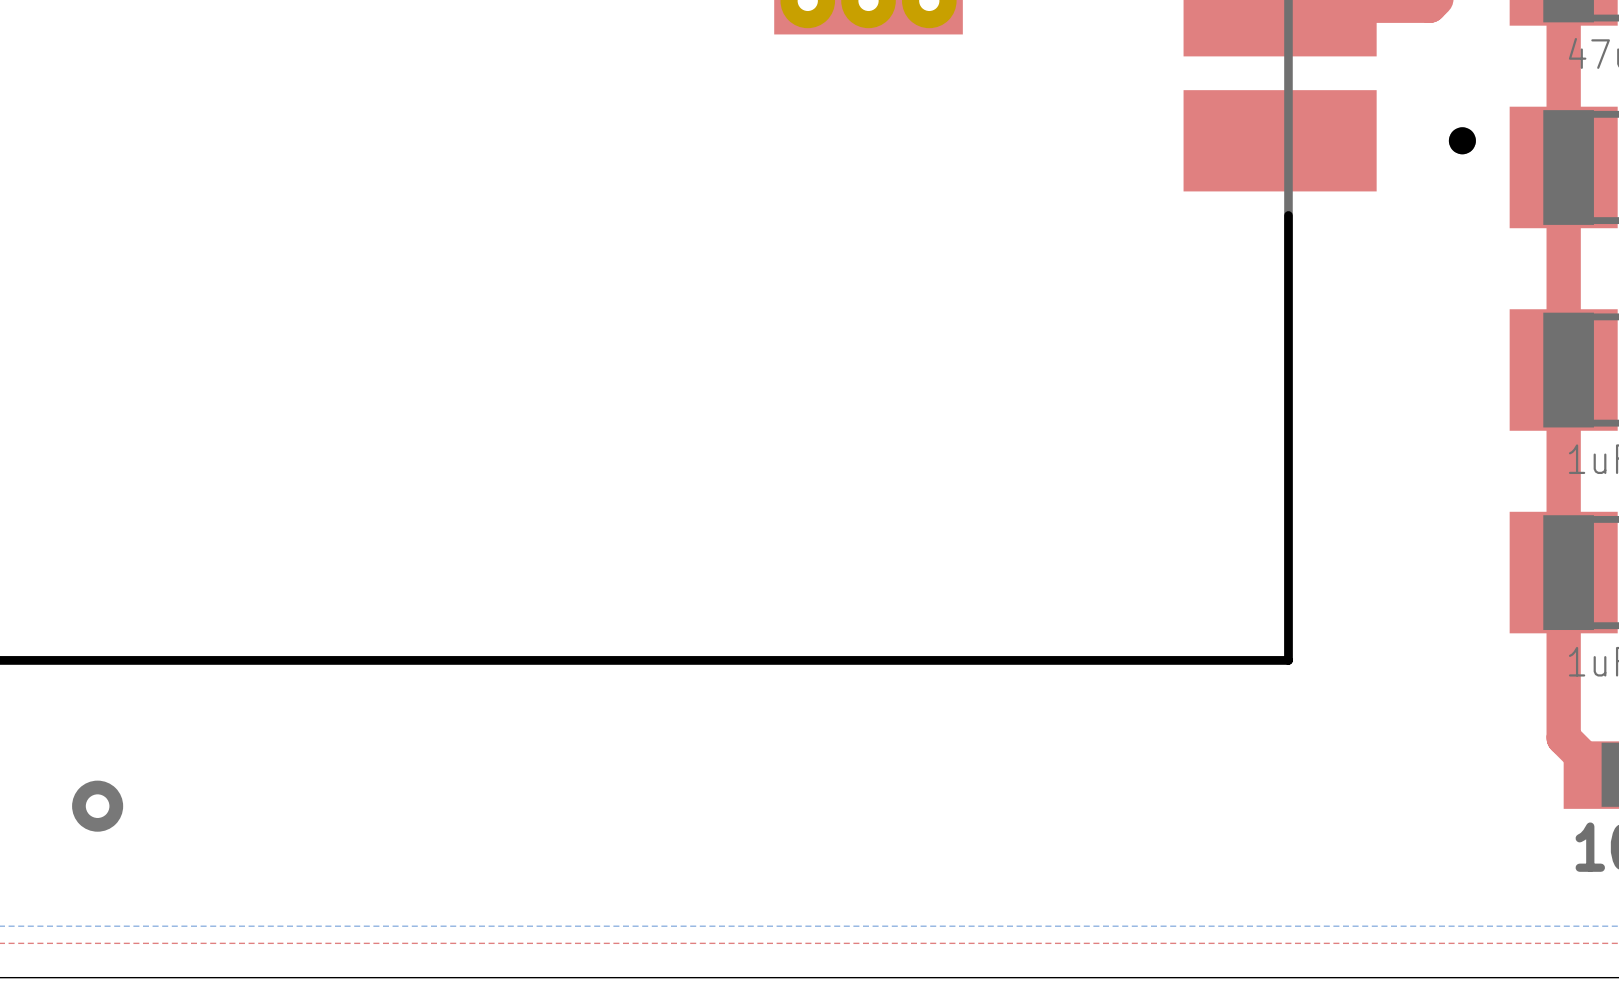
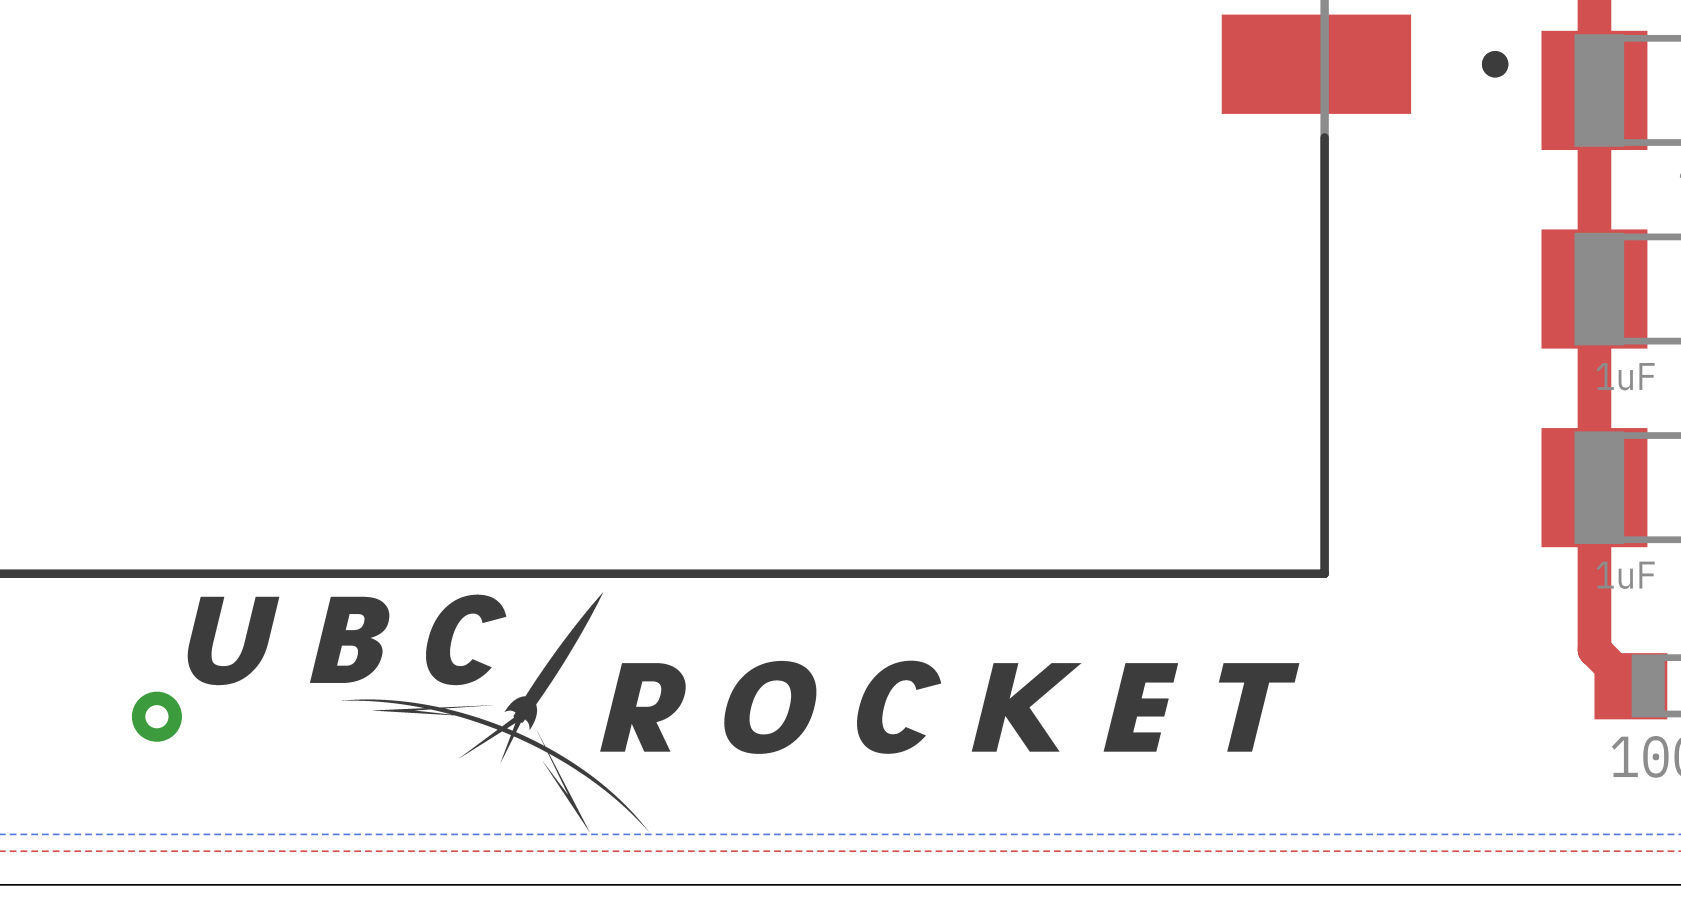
drawing: none -> [187, 592, 1300, 833]

